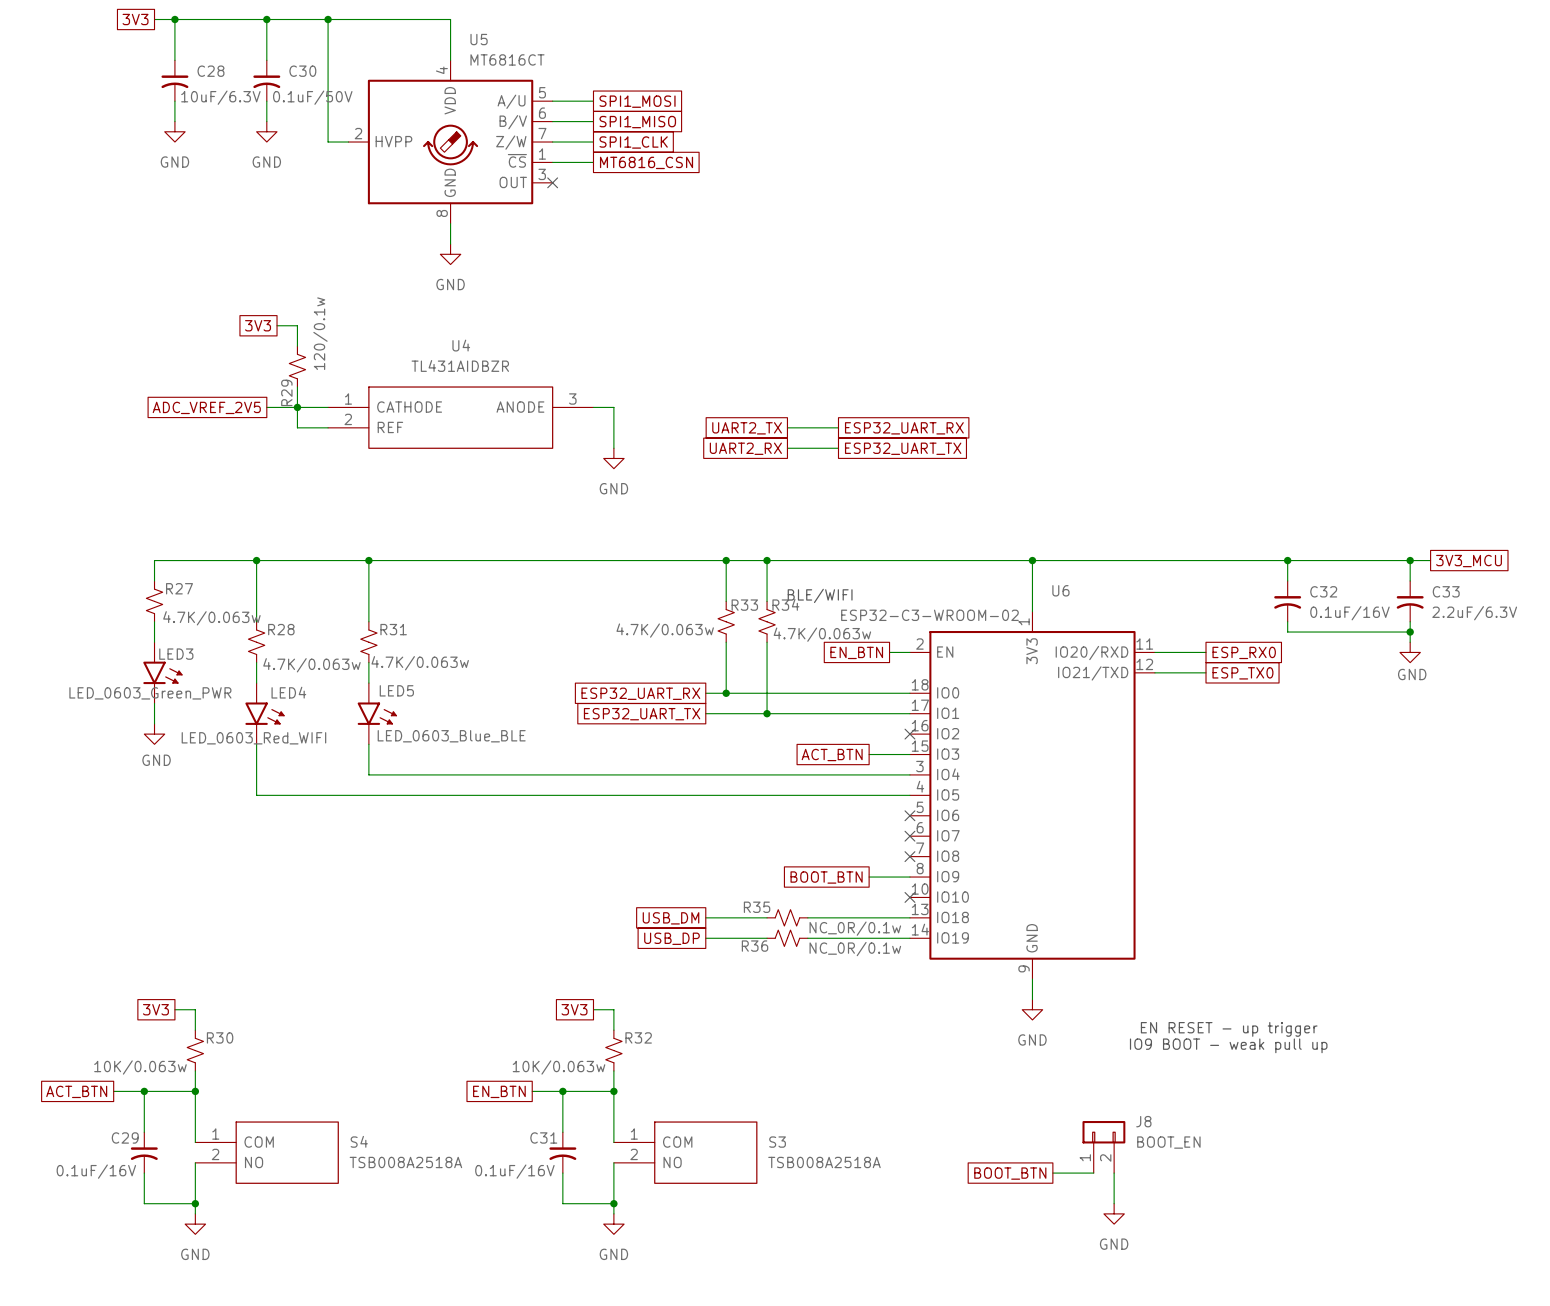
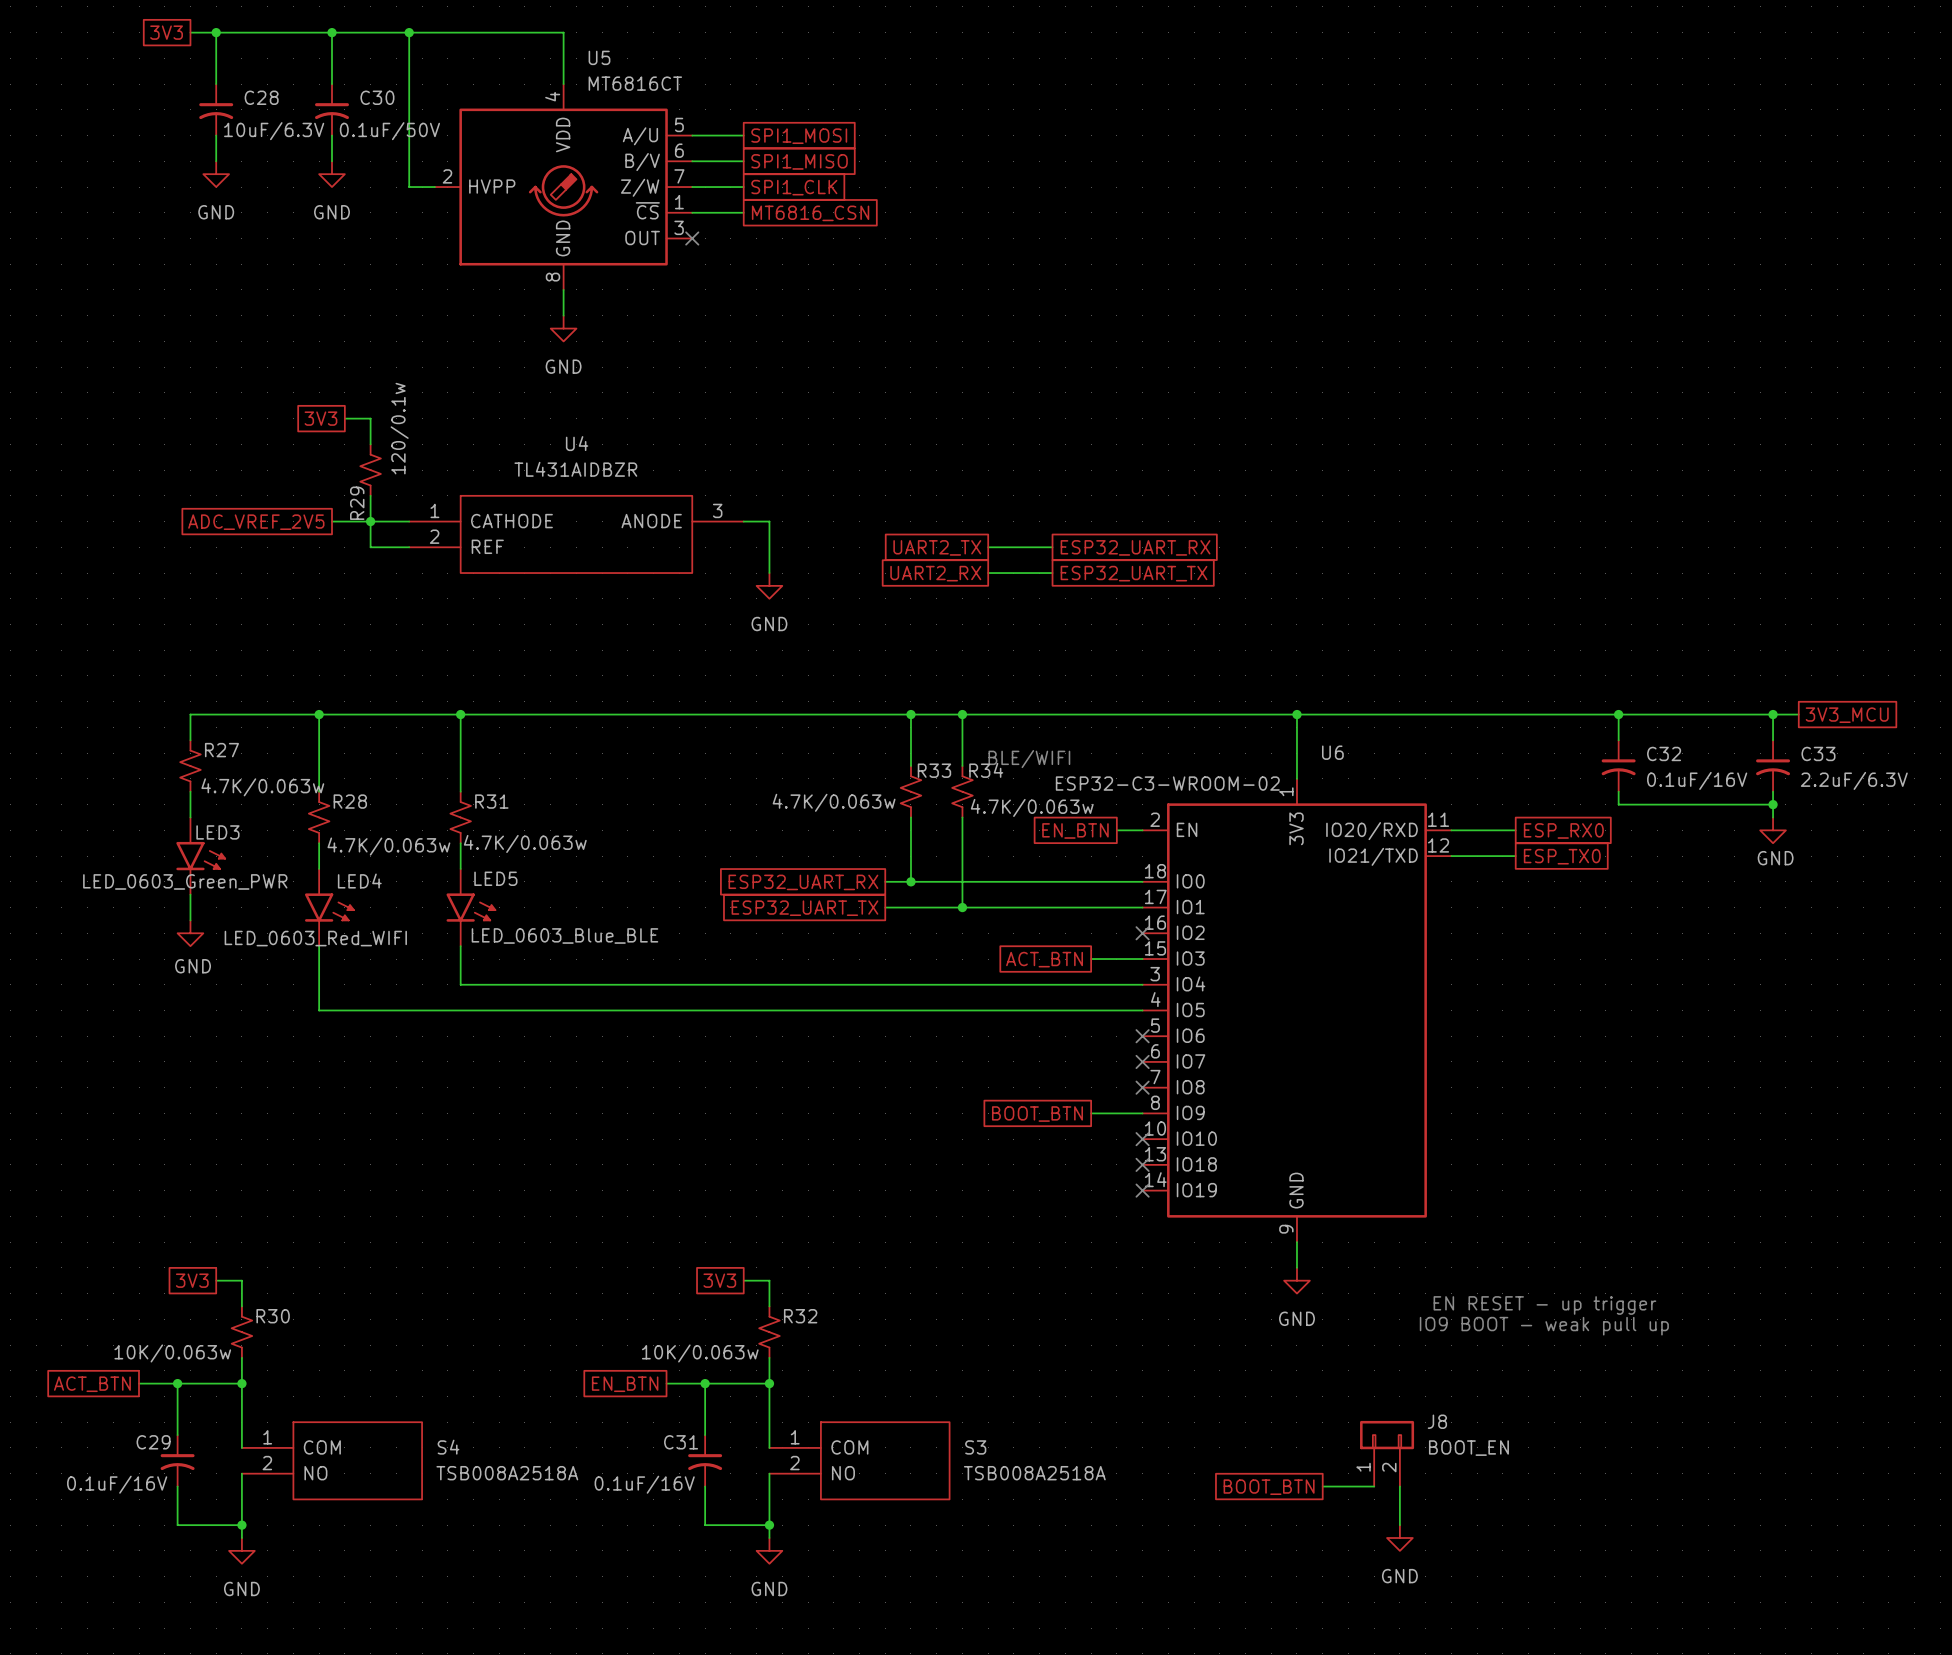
wire: (705, 917) (767, 917) -> none
R35: NC_0R/0.1w (787, 917) -> none
wire: (807, 917) (909, 917) -> none
no-connect mark: none -> (1142, 1164)
global label: USB_DM (671, 918) -> none
global label: USB_DP (671, 938) -> none
wire: (705, 938) (767, 938) -> none
R36: NC_0R/0.1w (787, 938) -> none
wire: (807, 938) (909, 938) -> none
no-connect mark: none -> (1142, 1190)

